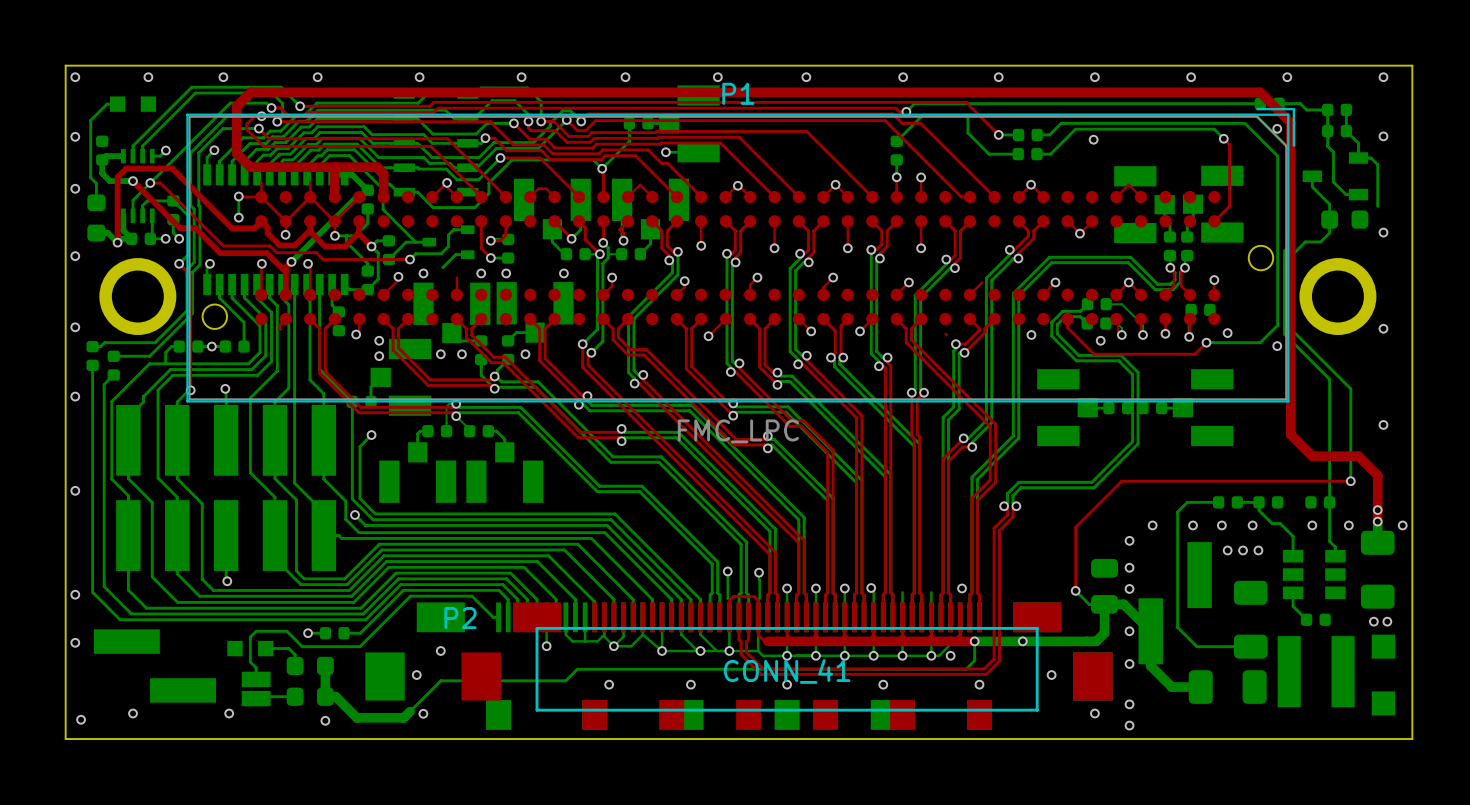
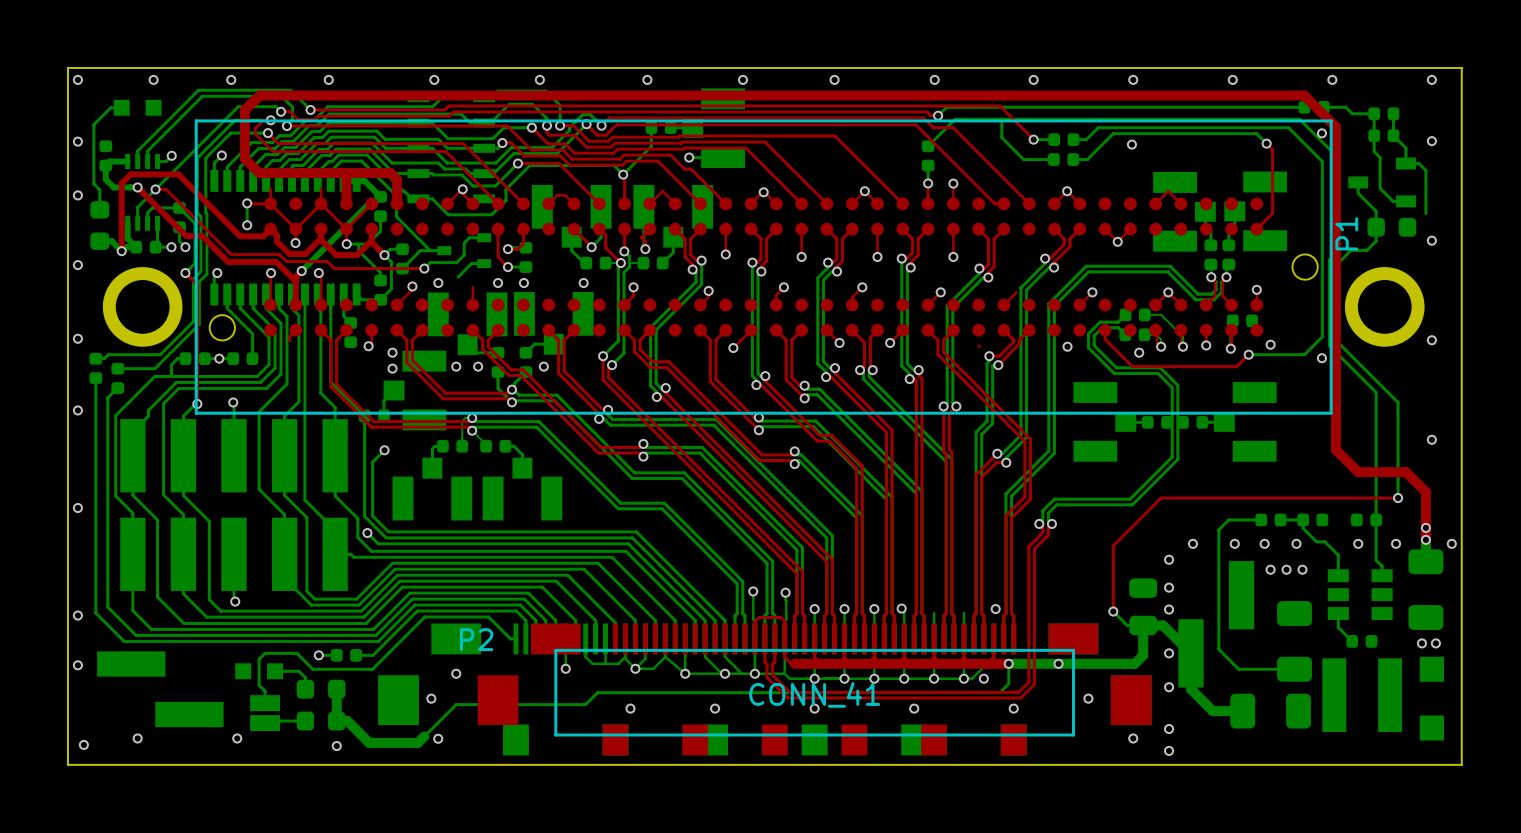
P1 name position: P1 (738, 93) -> P1 (1346, 233)
P1 footprint: [99, 107, 1377, 403] -> [102, 119, 1425, 415]
P1 value: FMC_LPC (738, 431) -> none

